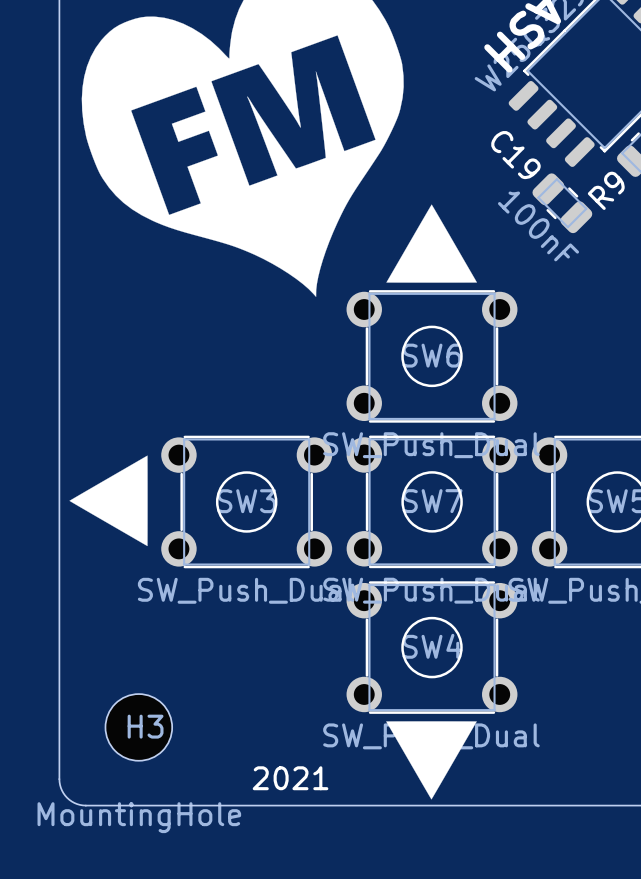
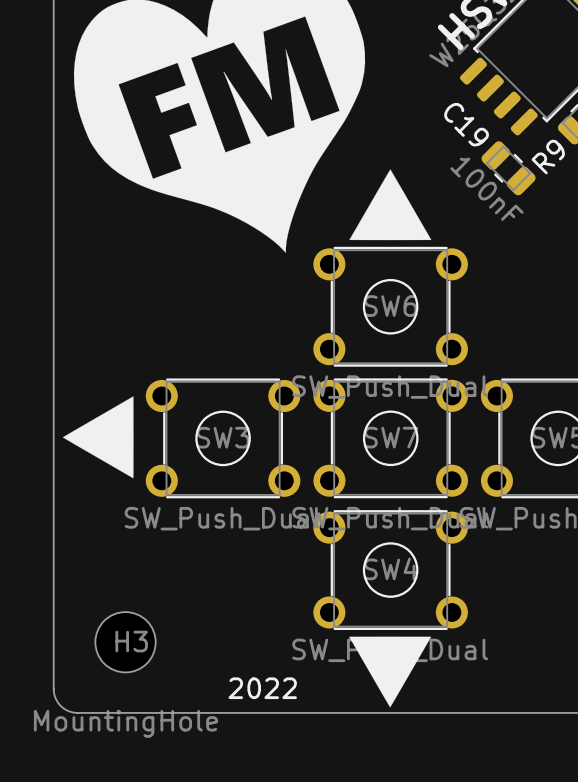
text: 2021 (290, 778) -> 2022 (262, 688)

